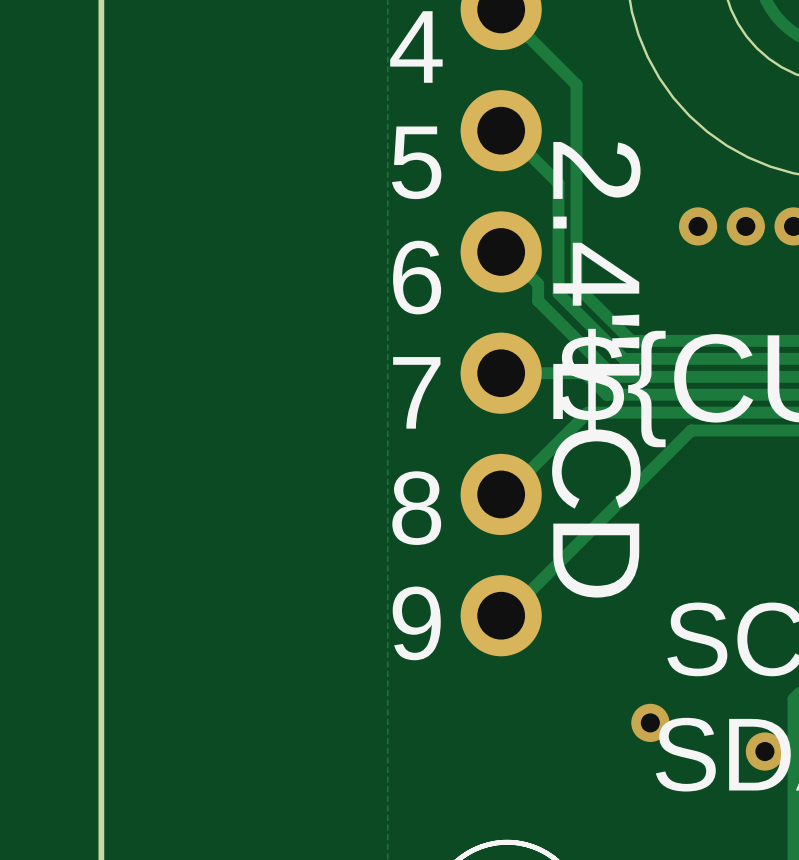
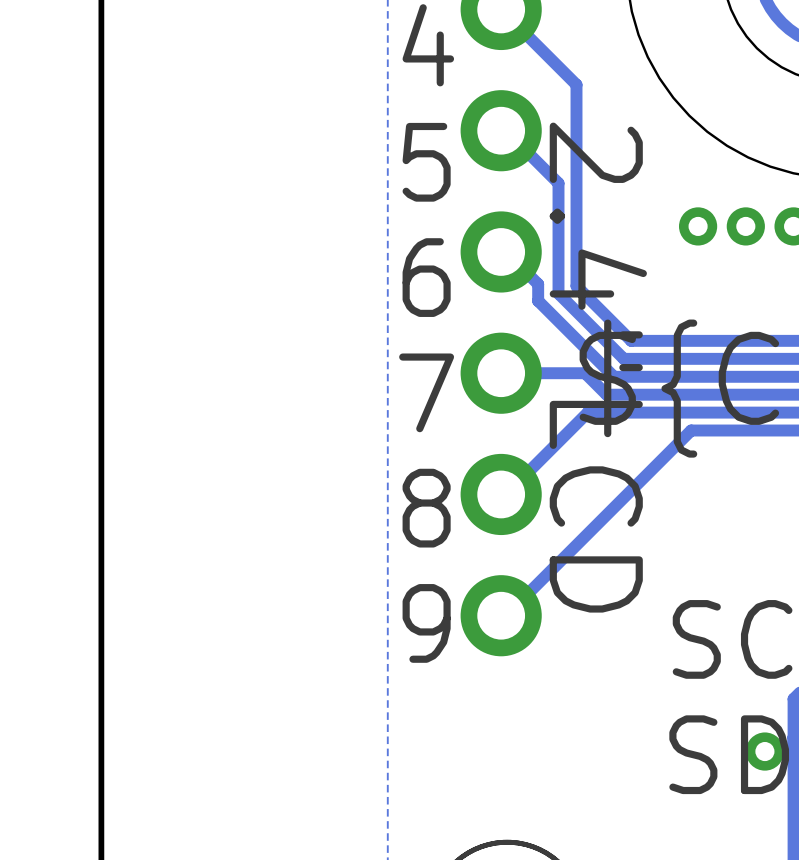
via: (650, 722) -> none

